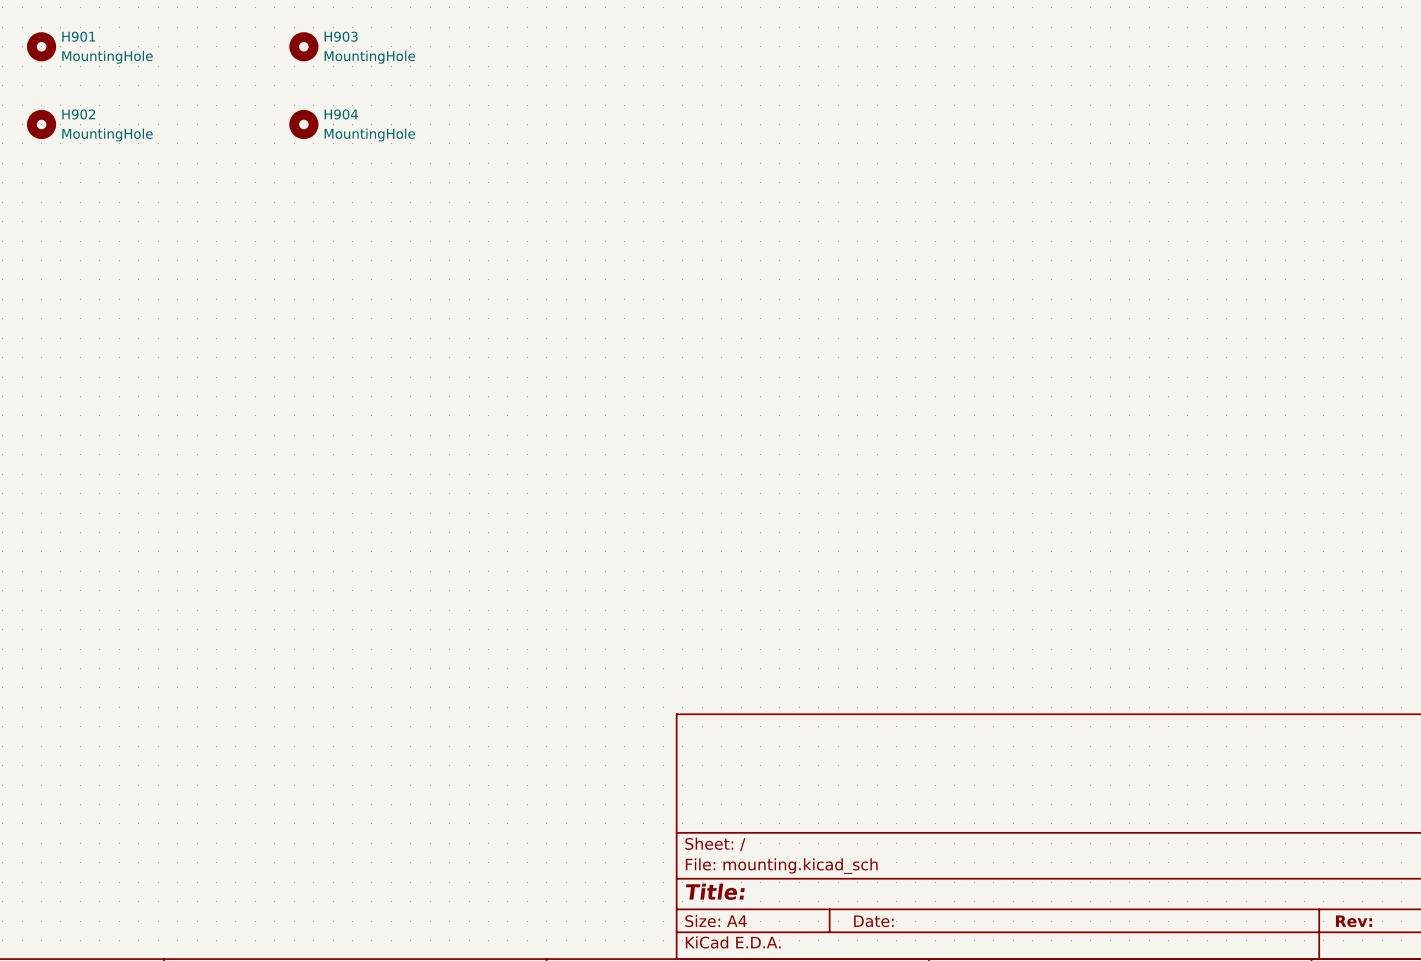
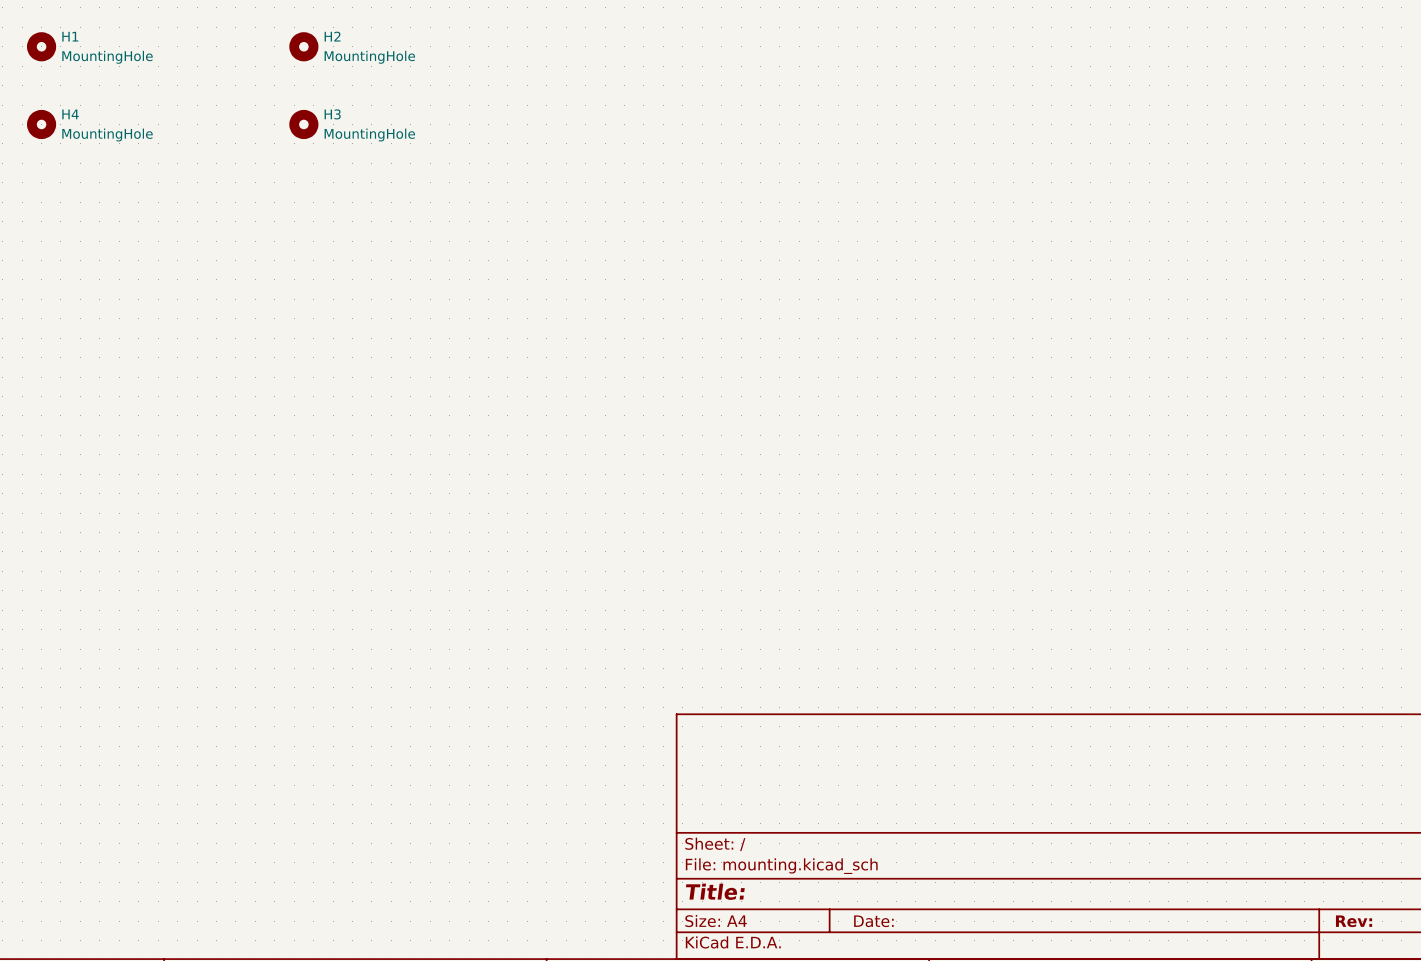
H901 name: H901 (78, 36) -> H1 (70, 36)
H903 name: H903 (341, 36) -> H2 (332, 36)
H902 name: H902 (78, 114) -> H4 (70, 114)
H904 name: H904 (341, 114) -> H3 (332, 114)

